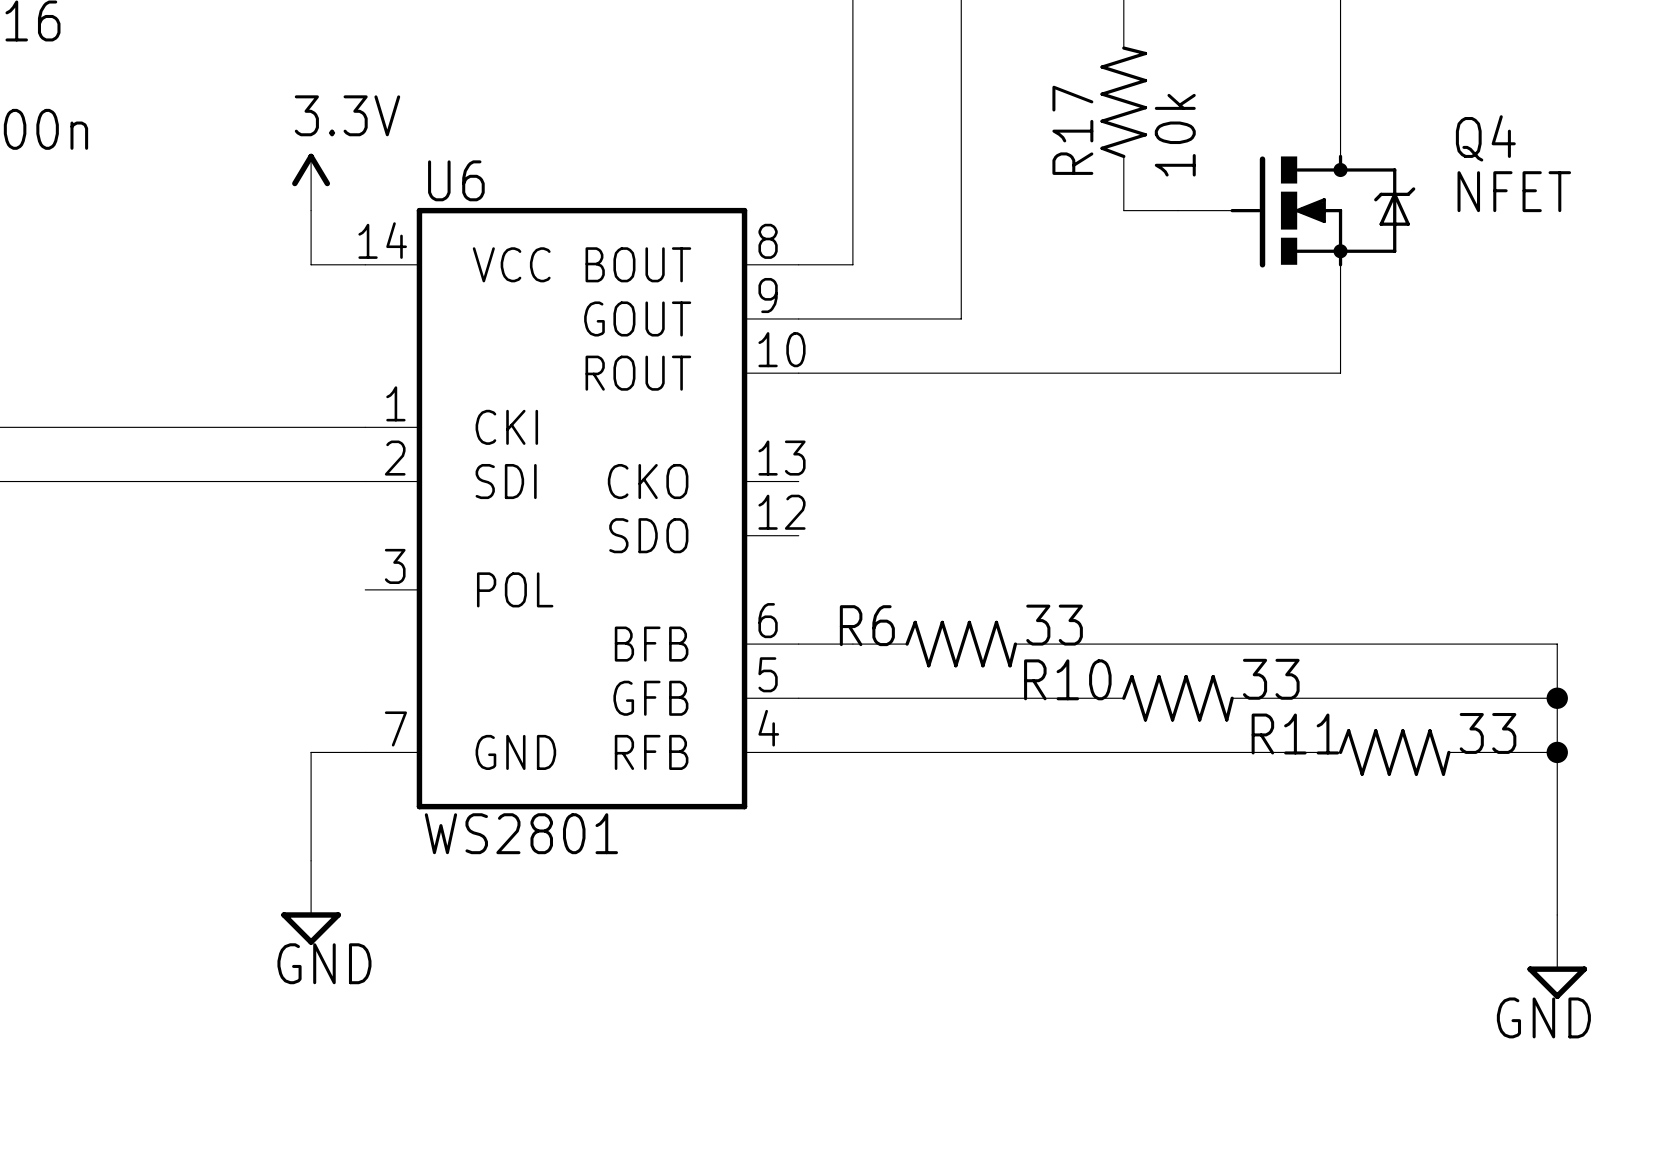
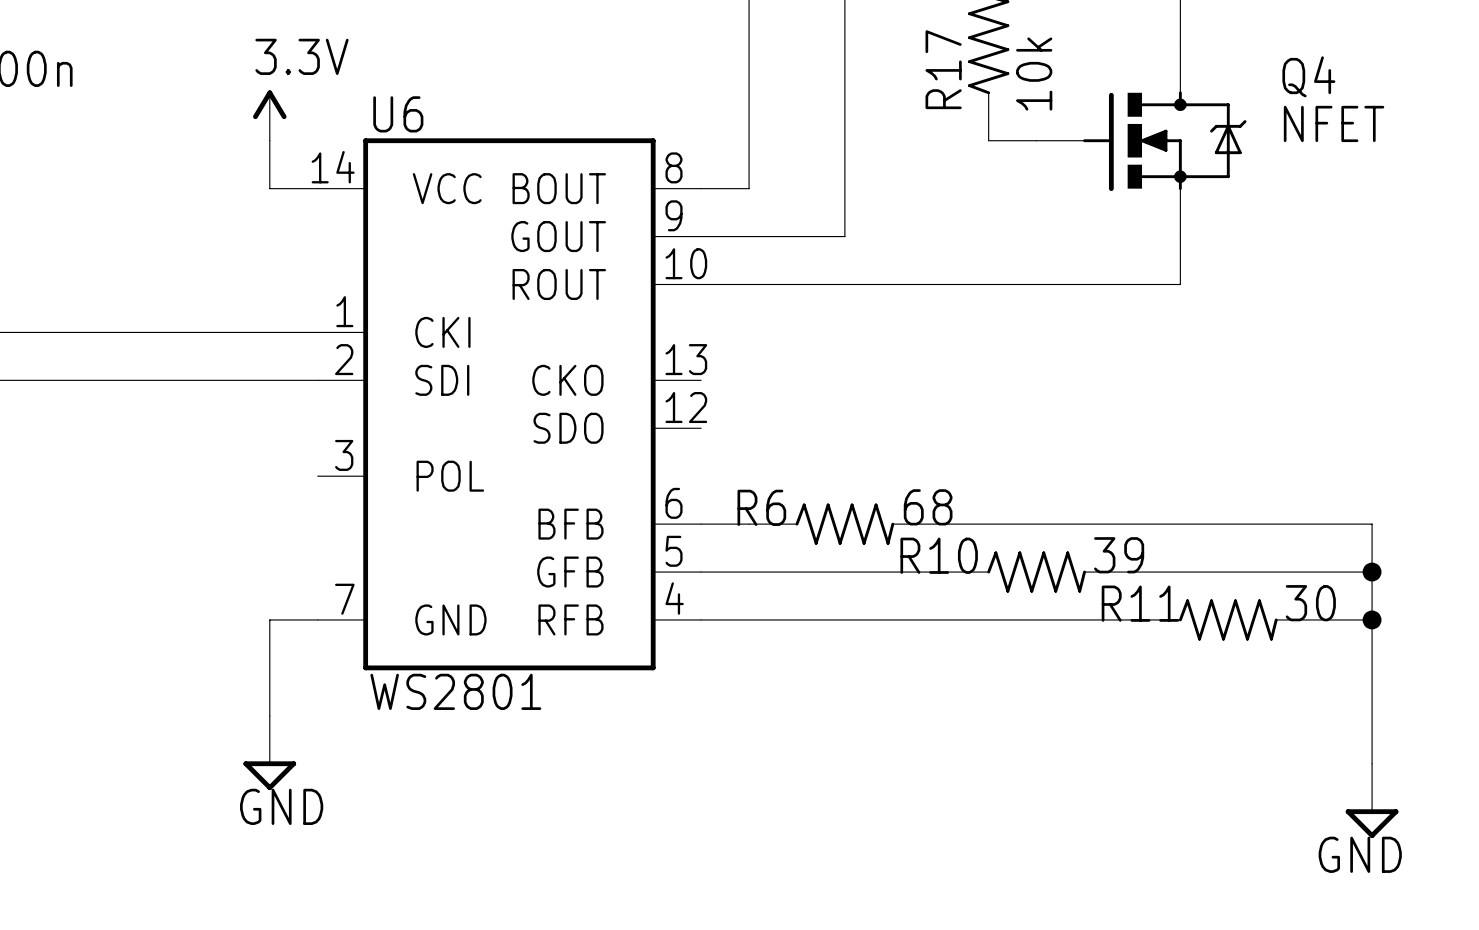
R6 value: 33 (1054, 625) -> 68 (928, 507)
R10 value: 33 (1271, 679) -> 39 (1119, 555)
R11 value: 33 (1488, 733) -> 30 (1310, 603)

